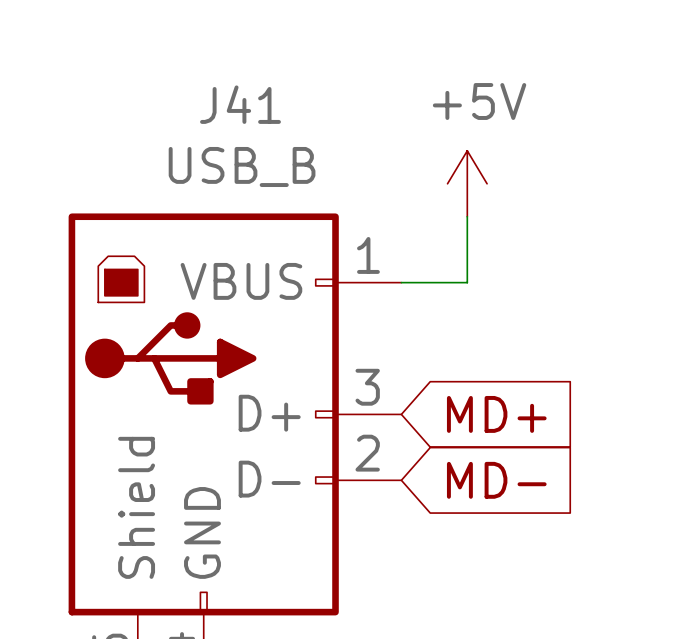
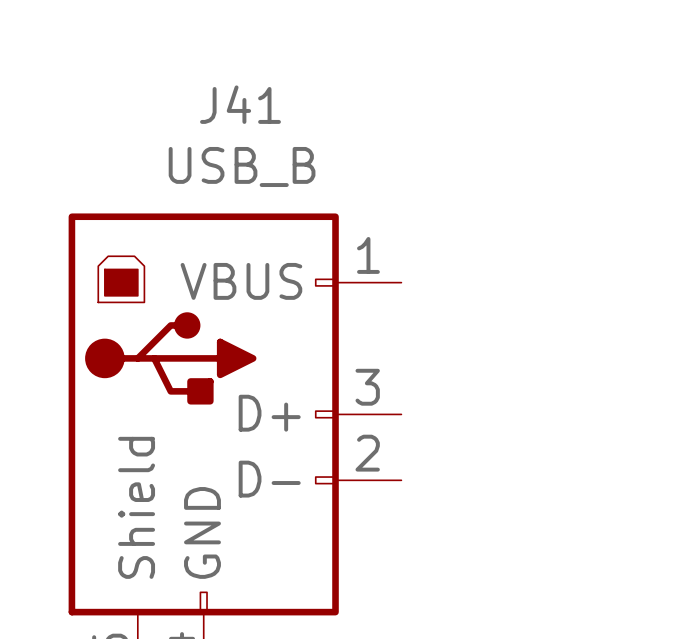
power symbol: +5V (467, 183) -> none
wire: (467, 216) (467, 282) (401, 282) -> none
global label: MD+ (496, 414) -> none
global label: MD- (496, 480) -> none

